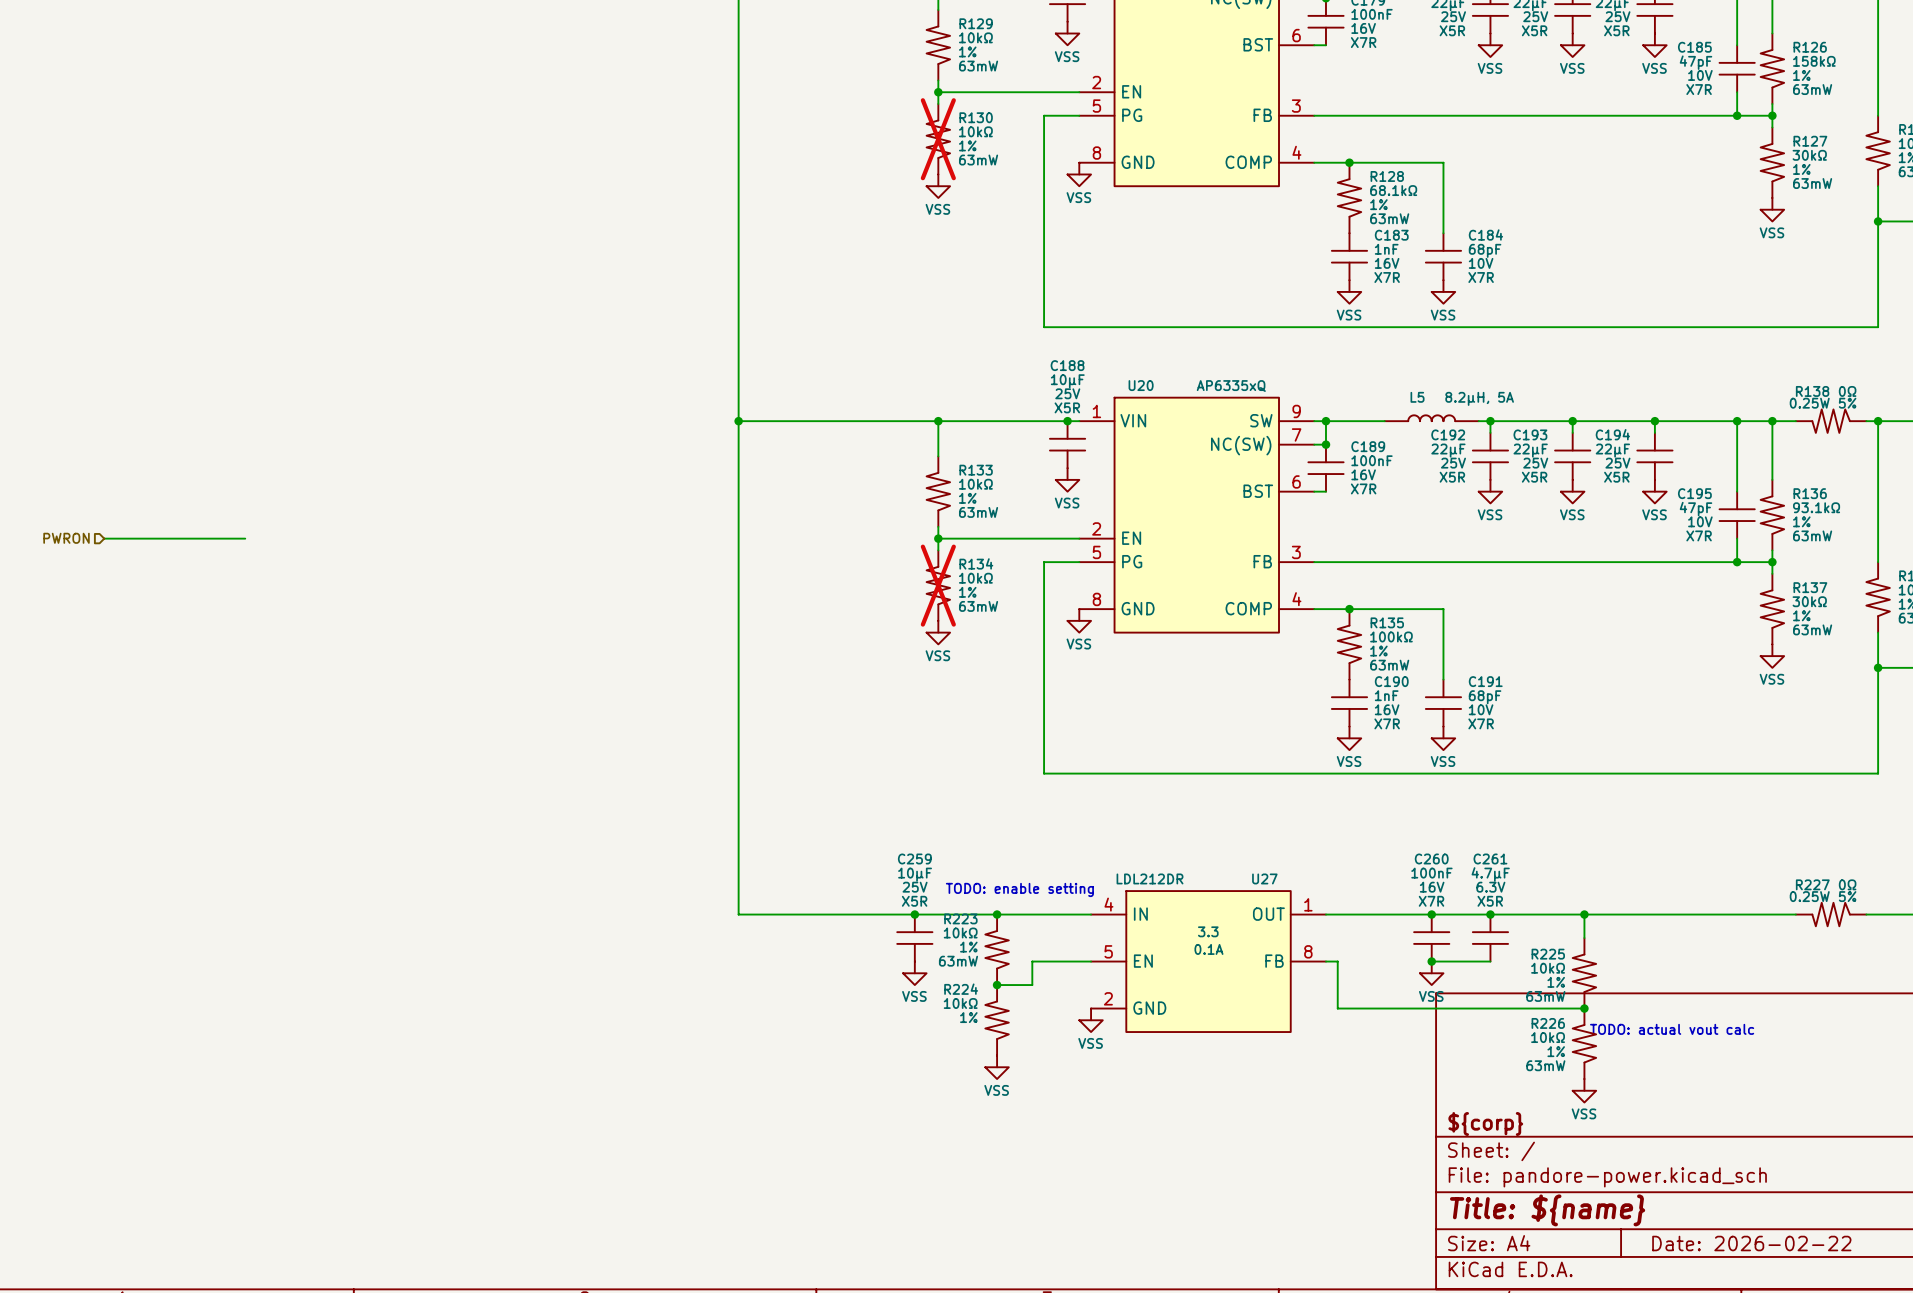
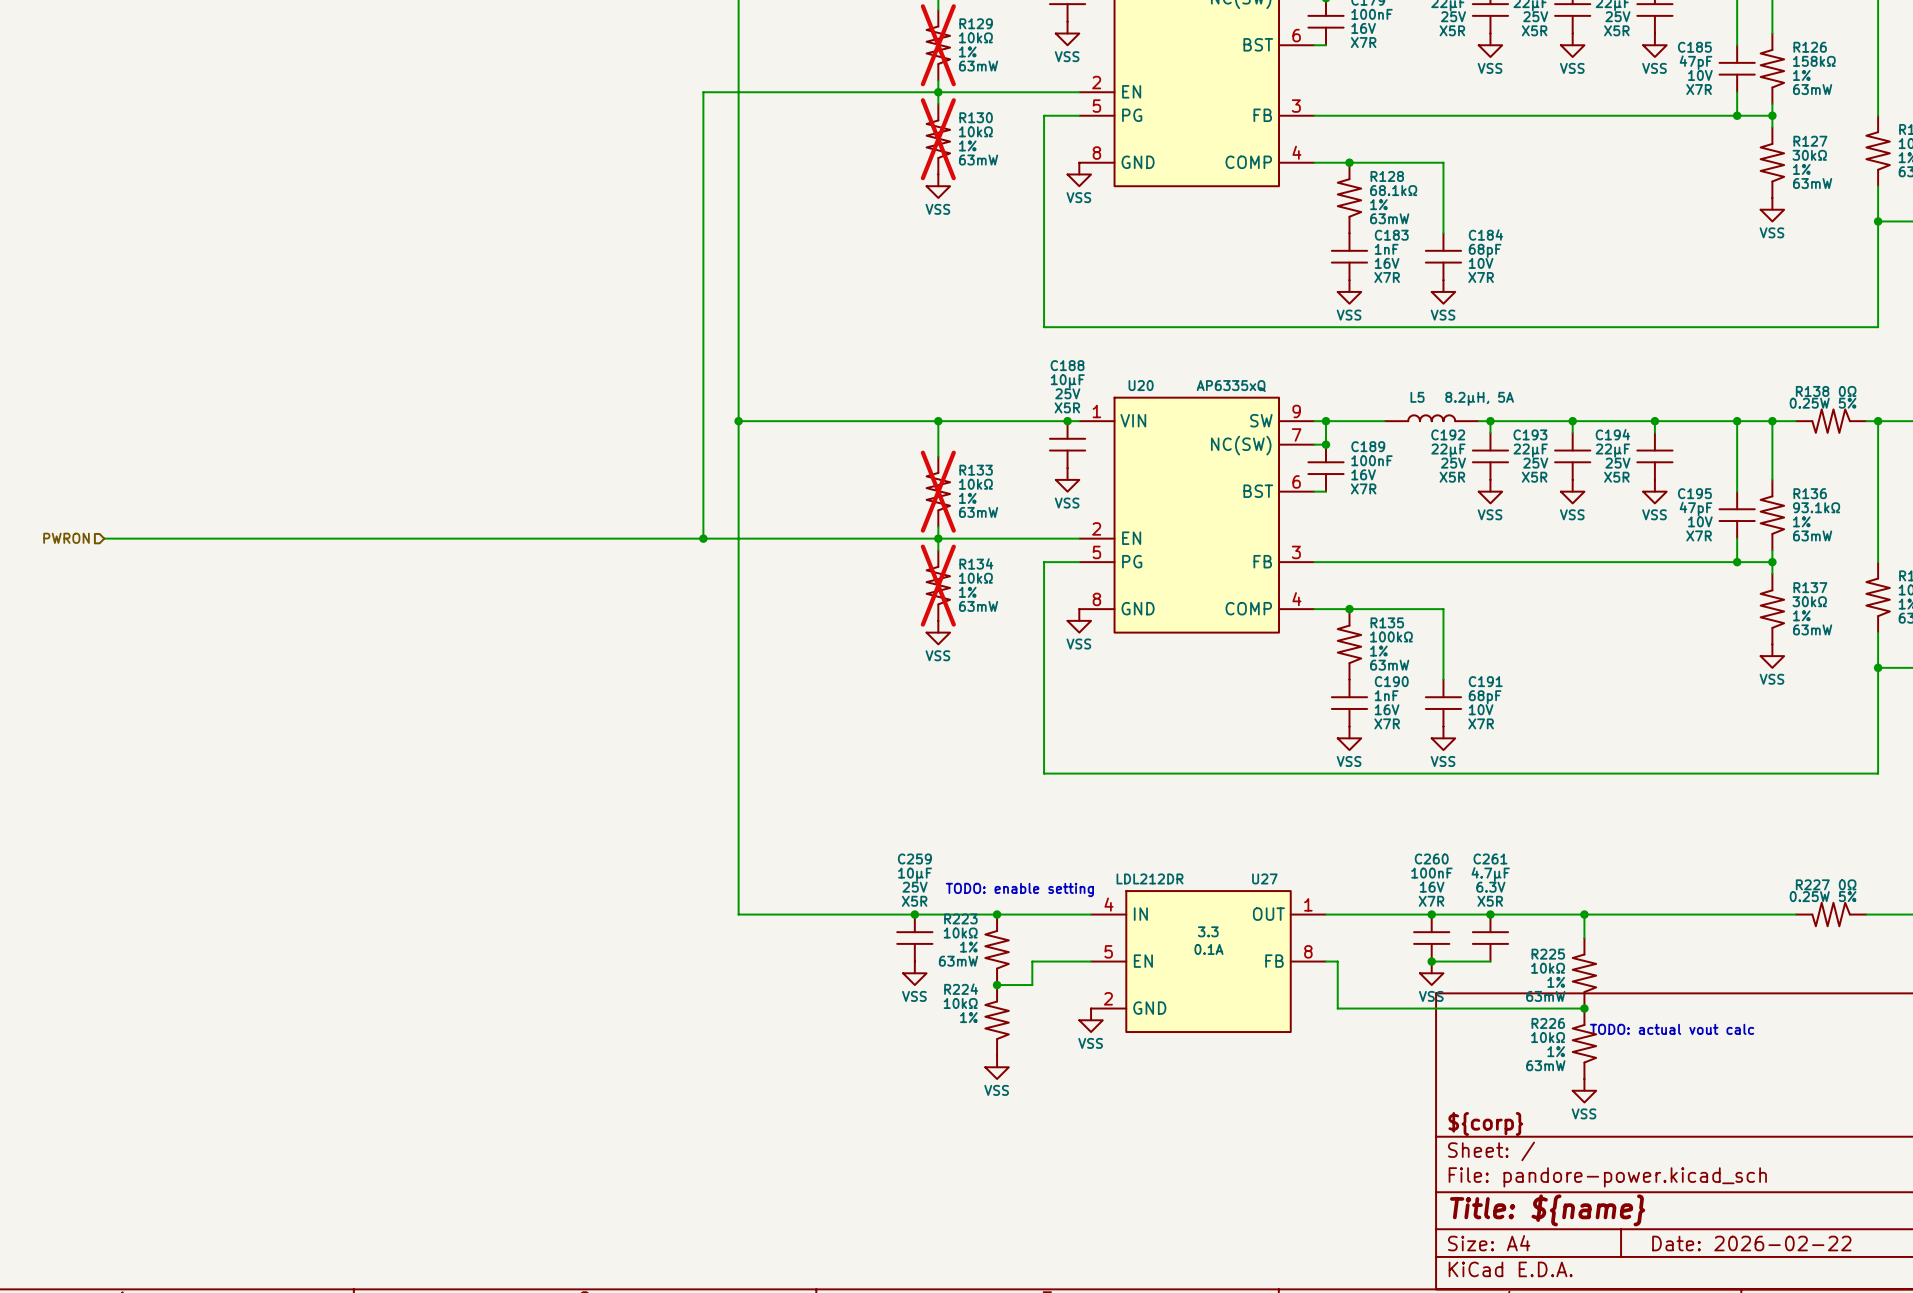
R129 do-not-place cross: none -> (938, 45)
wire: none -> (938, 92) (703, 92) (703, 538)
R133 do-not-place cross: none -> (938, 491)
wire: none -> (245, 538) (938, 538)
junction: none -> (703, 538)

